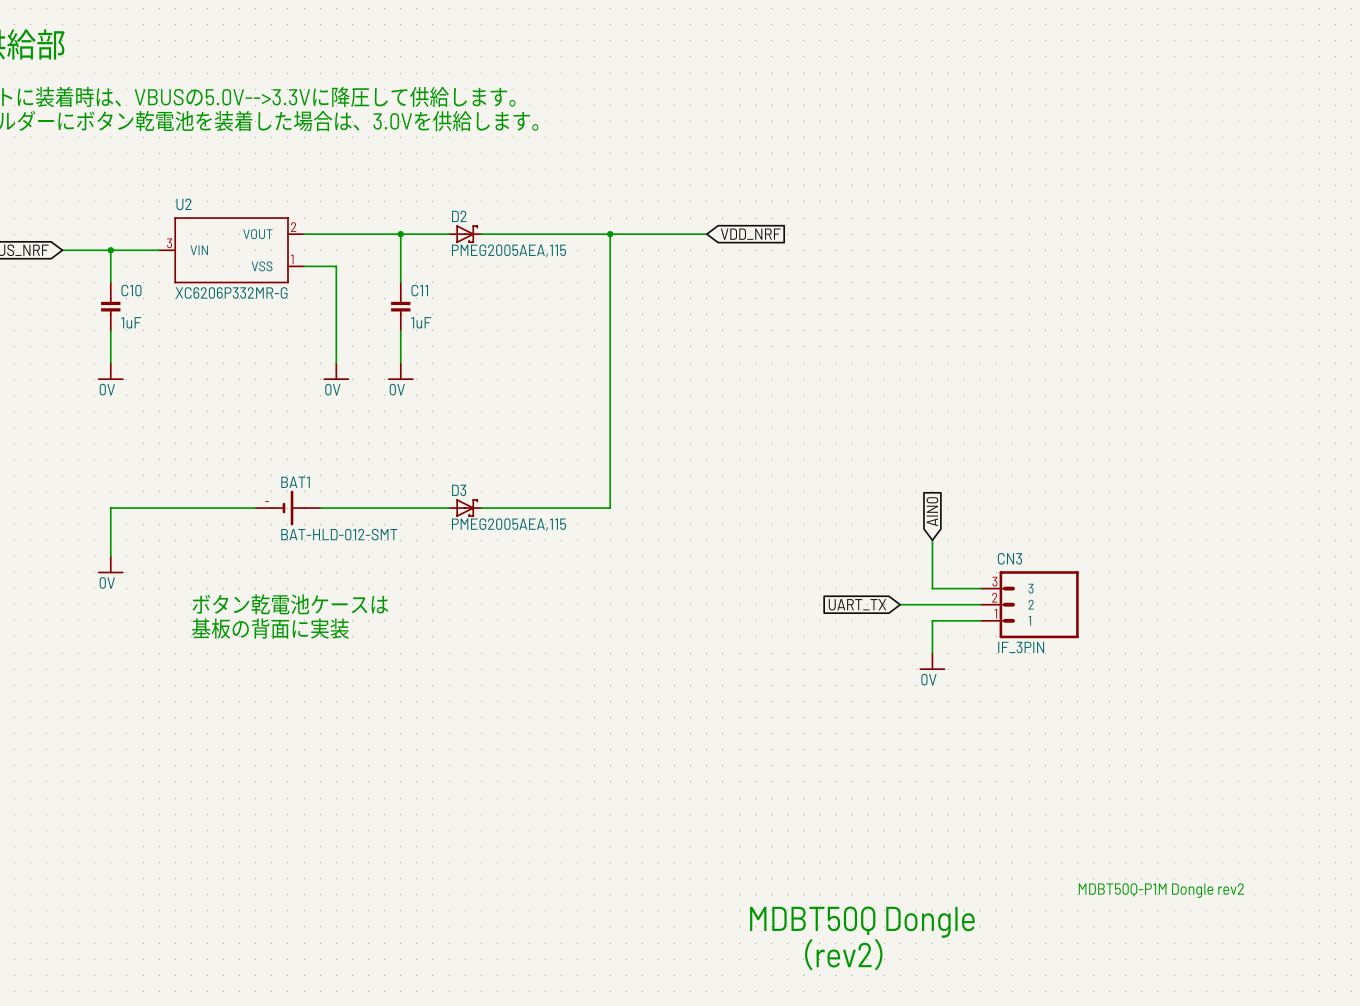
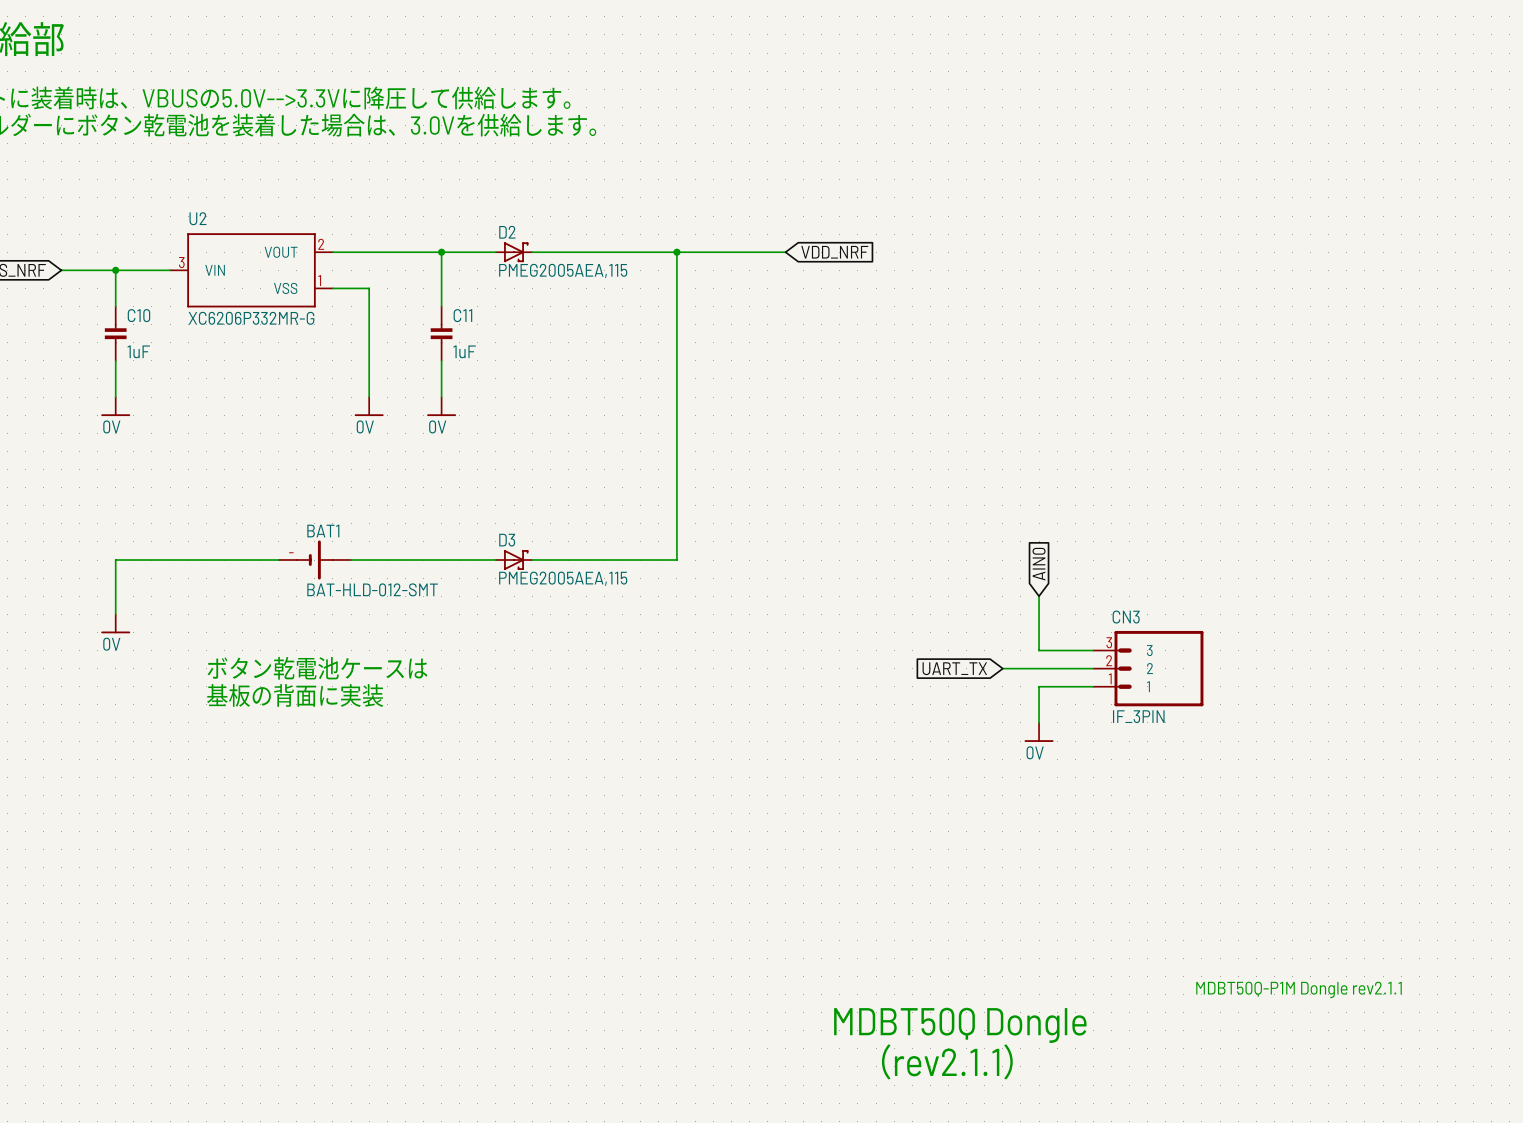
text: MDBT50Q-P1M Dongle rev2 (1161, 890) -> MDBT50Q-P1M Dongle rev2.1.1 (1299, 989)
text: （rev2） (843, 954) -> （rev2.1.1） (947, 1061)

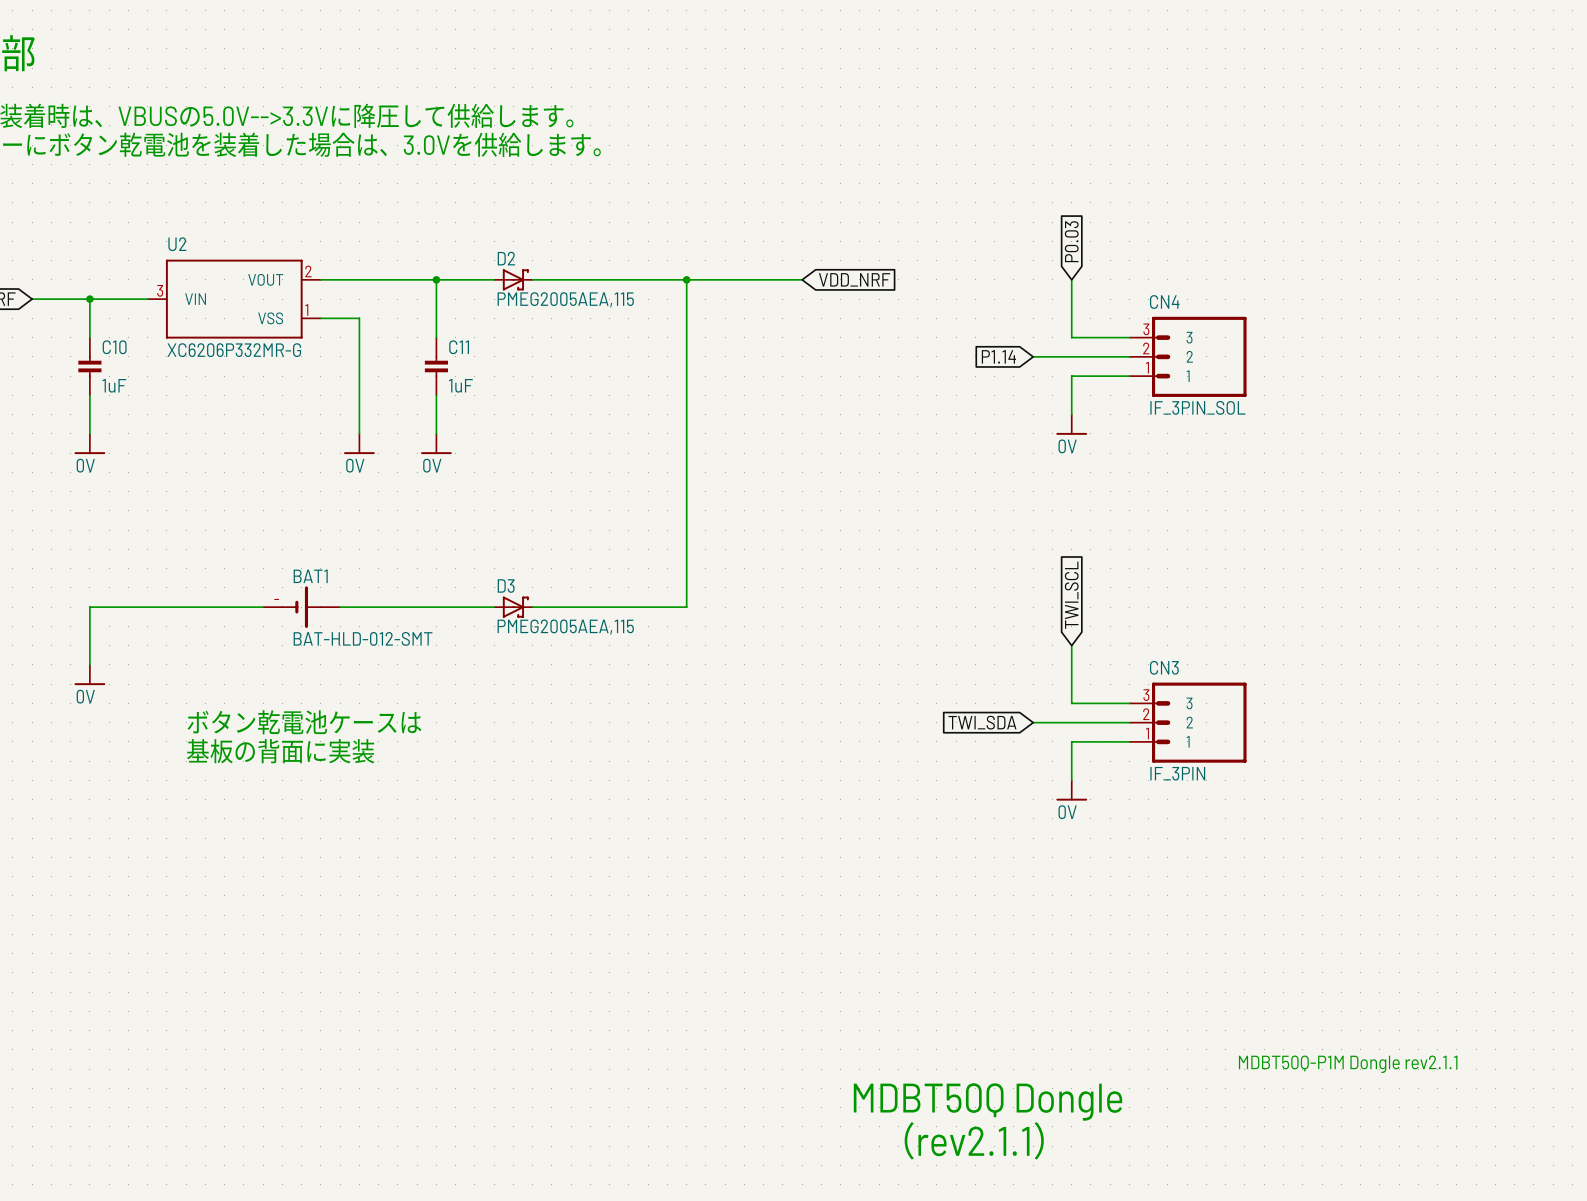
global label: none -> P0.03 (1071, 241)
wire: none -> (1071, 279) (1071, 337) (1129, 337)
global label: none -> P1.14 (998, 356)
wire: none -> (1033, 356) (1129, 356)
CN4: none -> IF_3PIN_SOL (1188, 356)
wire: none -> (1129, 376) (1071, 376) (1071, 414)
power symbol: none -> 0V (1071, 424)
global label: AIN0 (1039, 564) -> TWI_SCL (1071, 595)
global label: UART_TX (954, 668) -> TWI_SDA (982, 722)

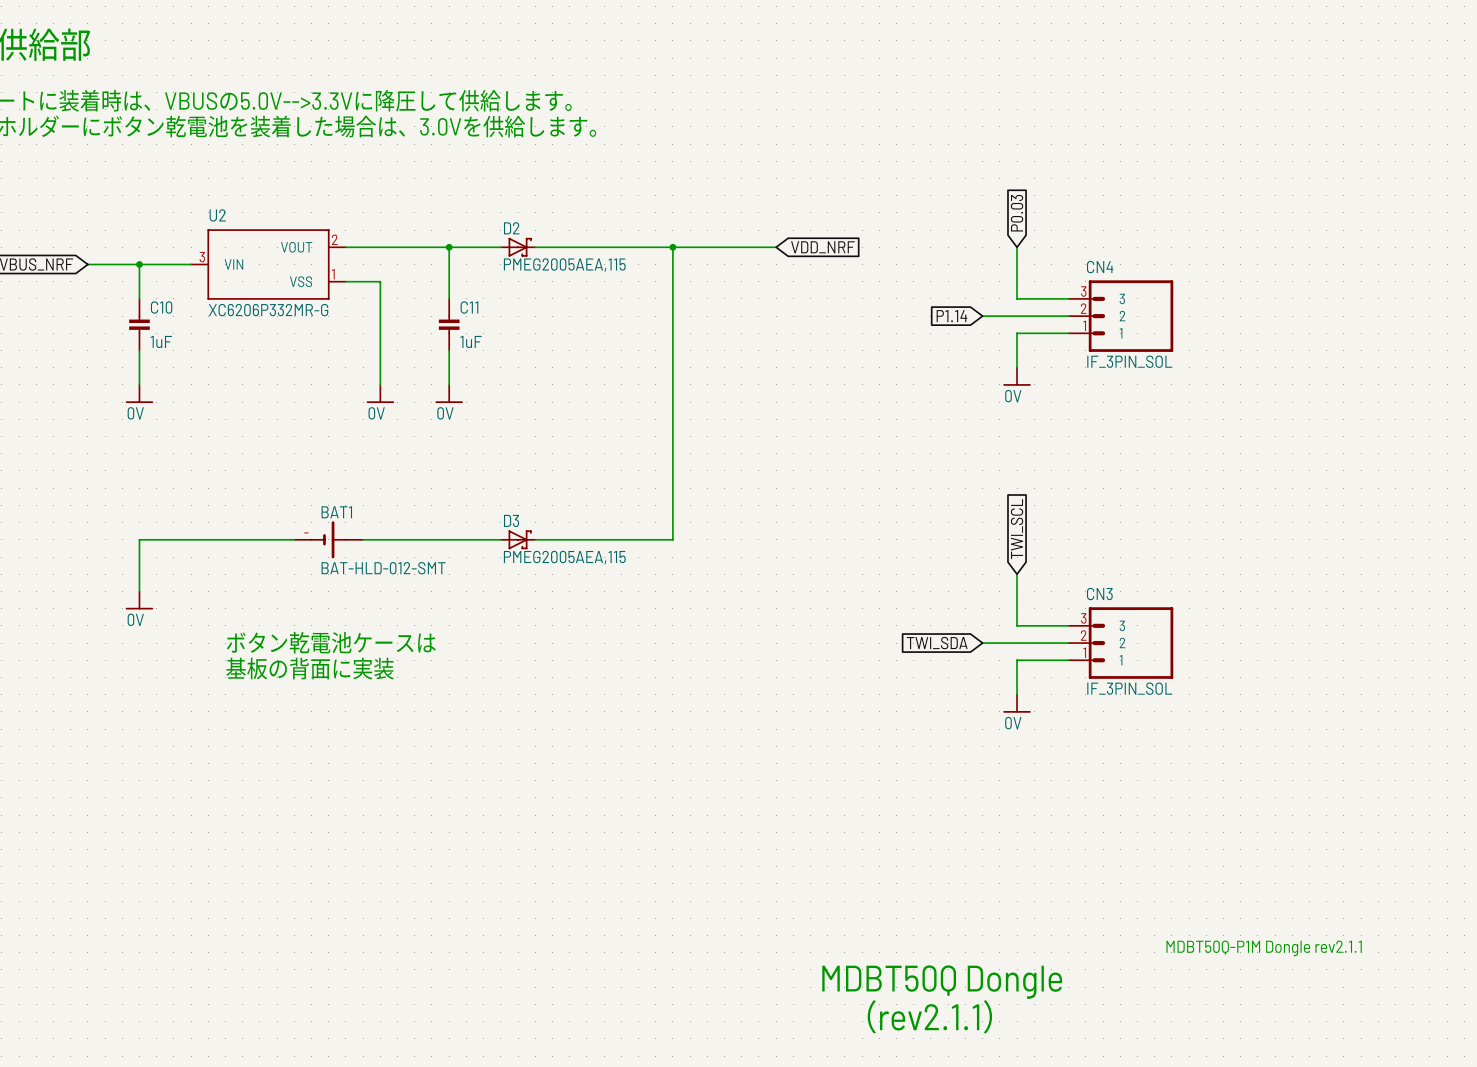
CN3 value: IF_3PIN (1177, 773) -> IF_3PIN_SOL (1129, 688)

